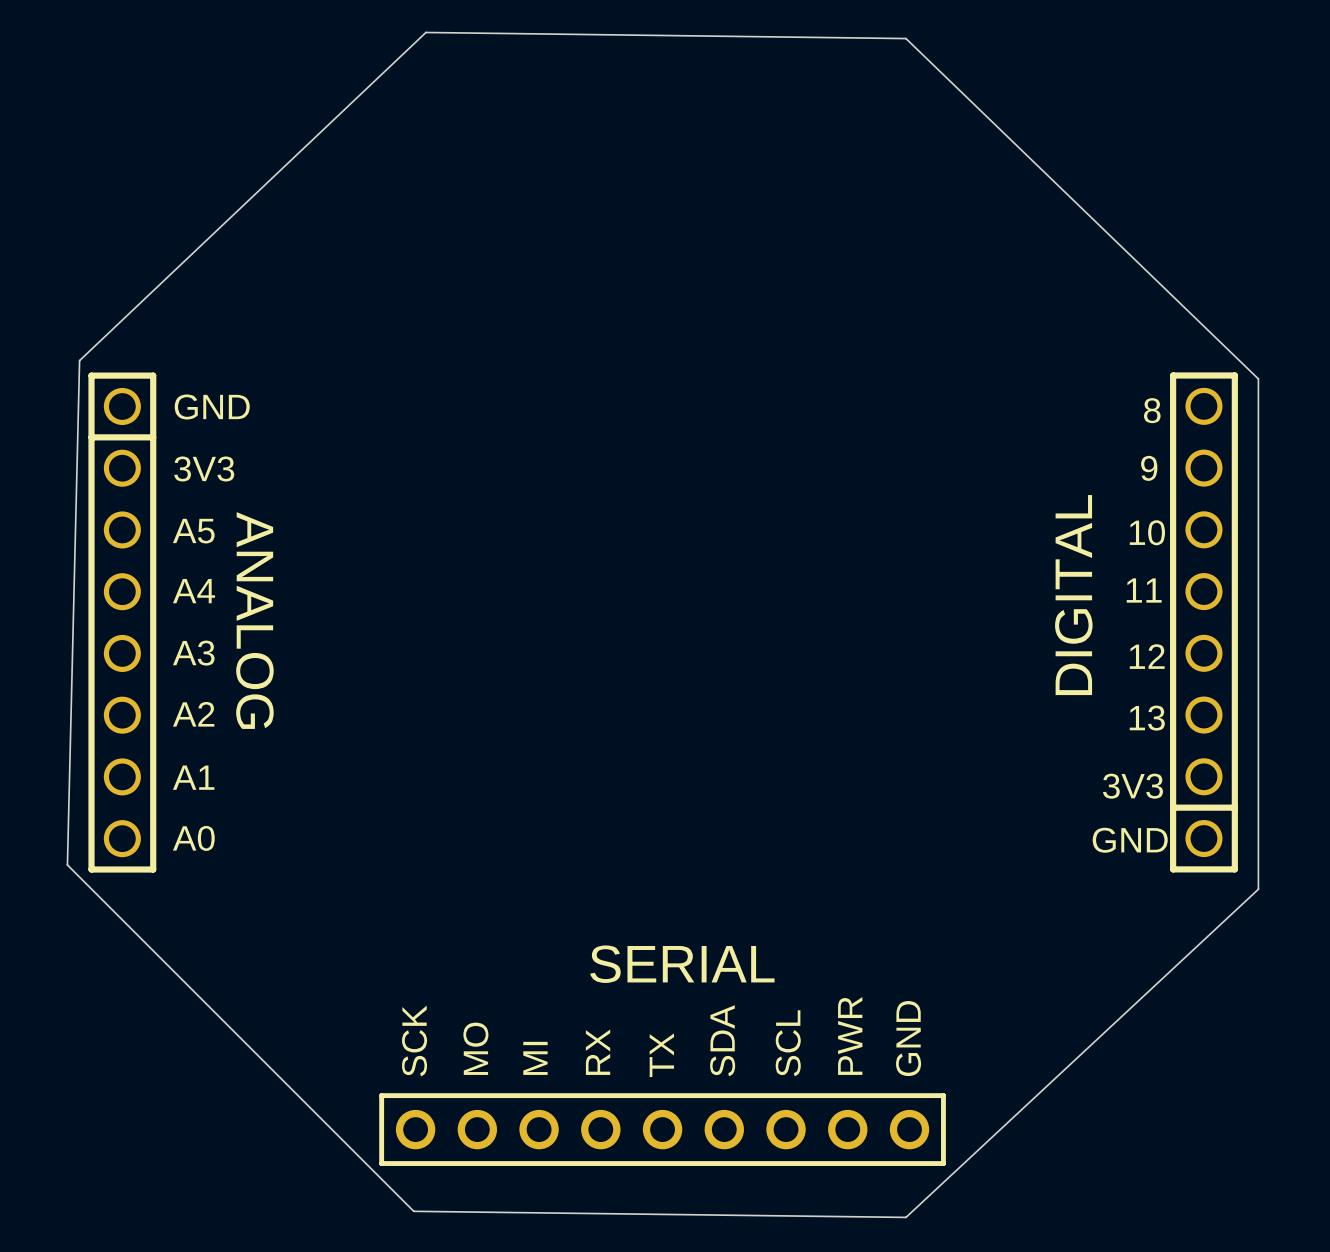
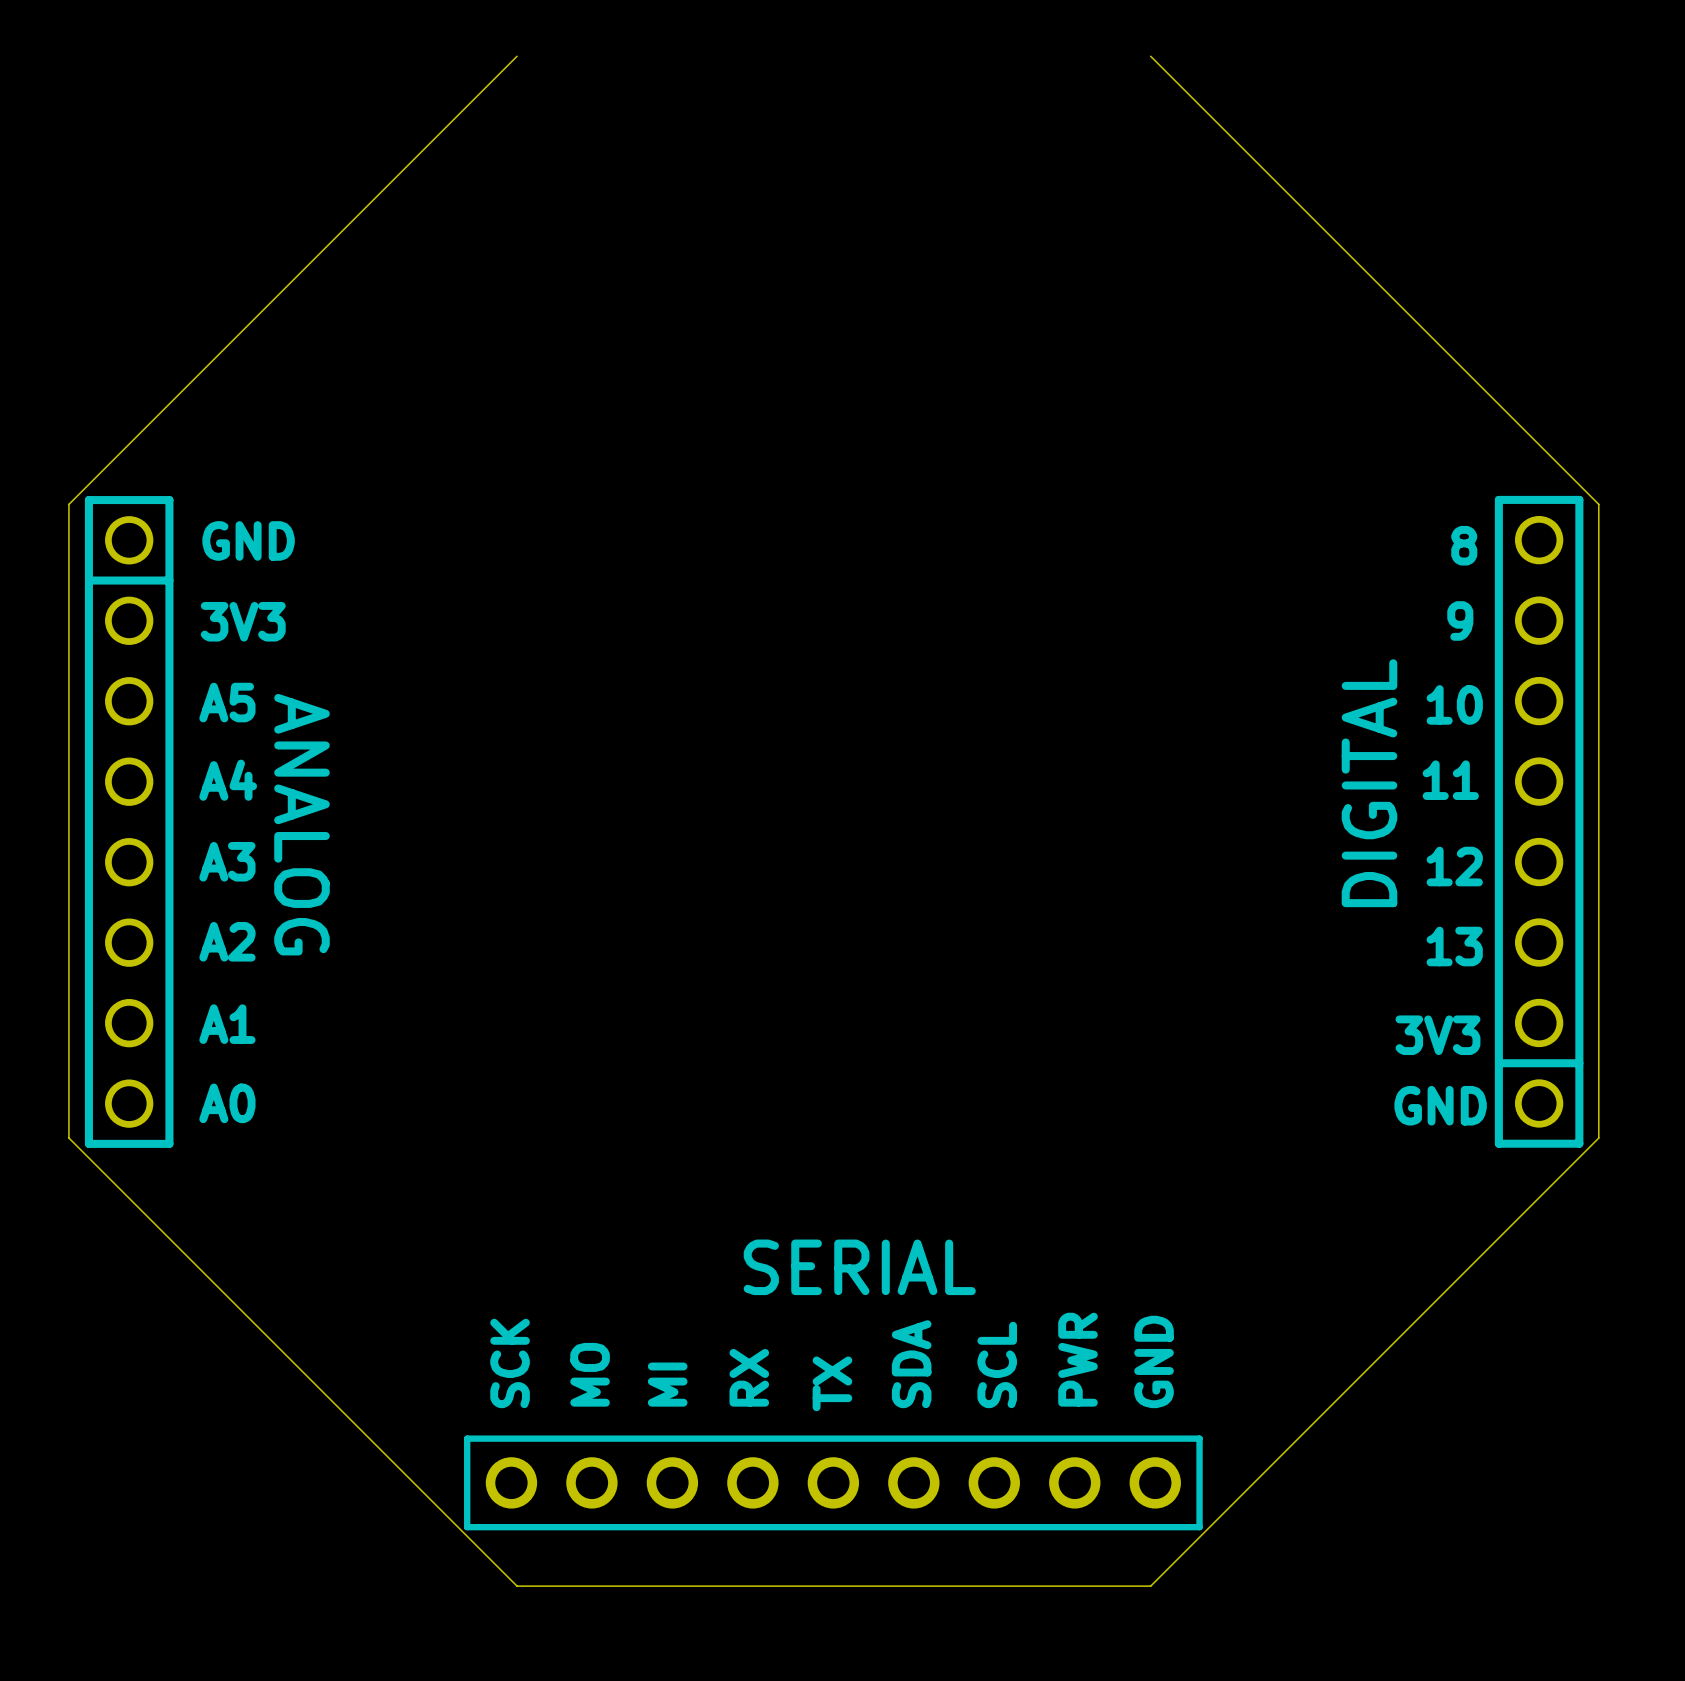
board edge: (425, 32) (79, 360) (67, 864) (413, 1211) (906, 1217) (1258, 889) (1258, 378) (905, 38) (425, 32) -> none
board edge: none -> (517, 56) (68, 504) (68, 1138) (517, 1586) (1150, 1586) (1598, 1138) (1598, 504) (1150, 56)

